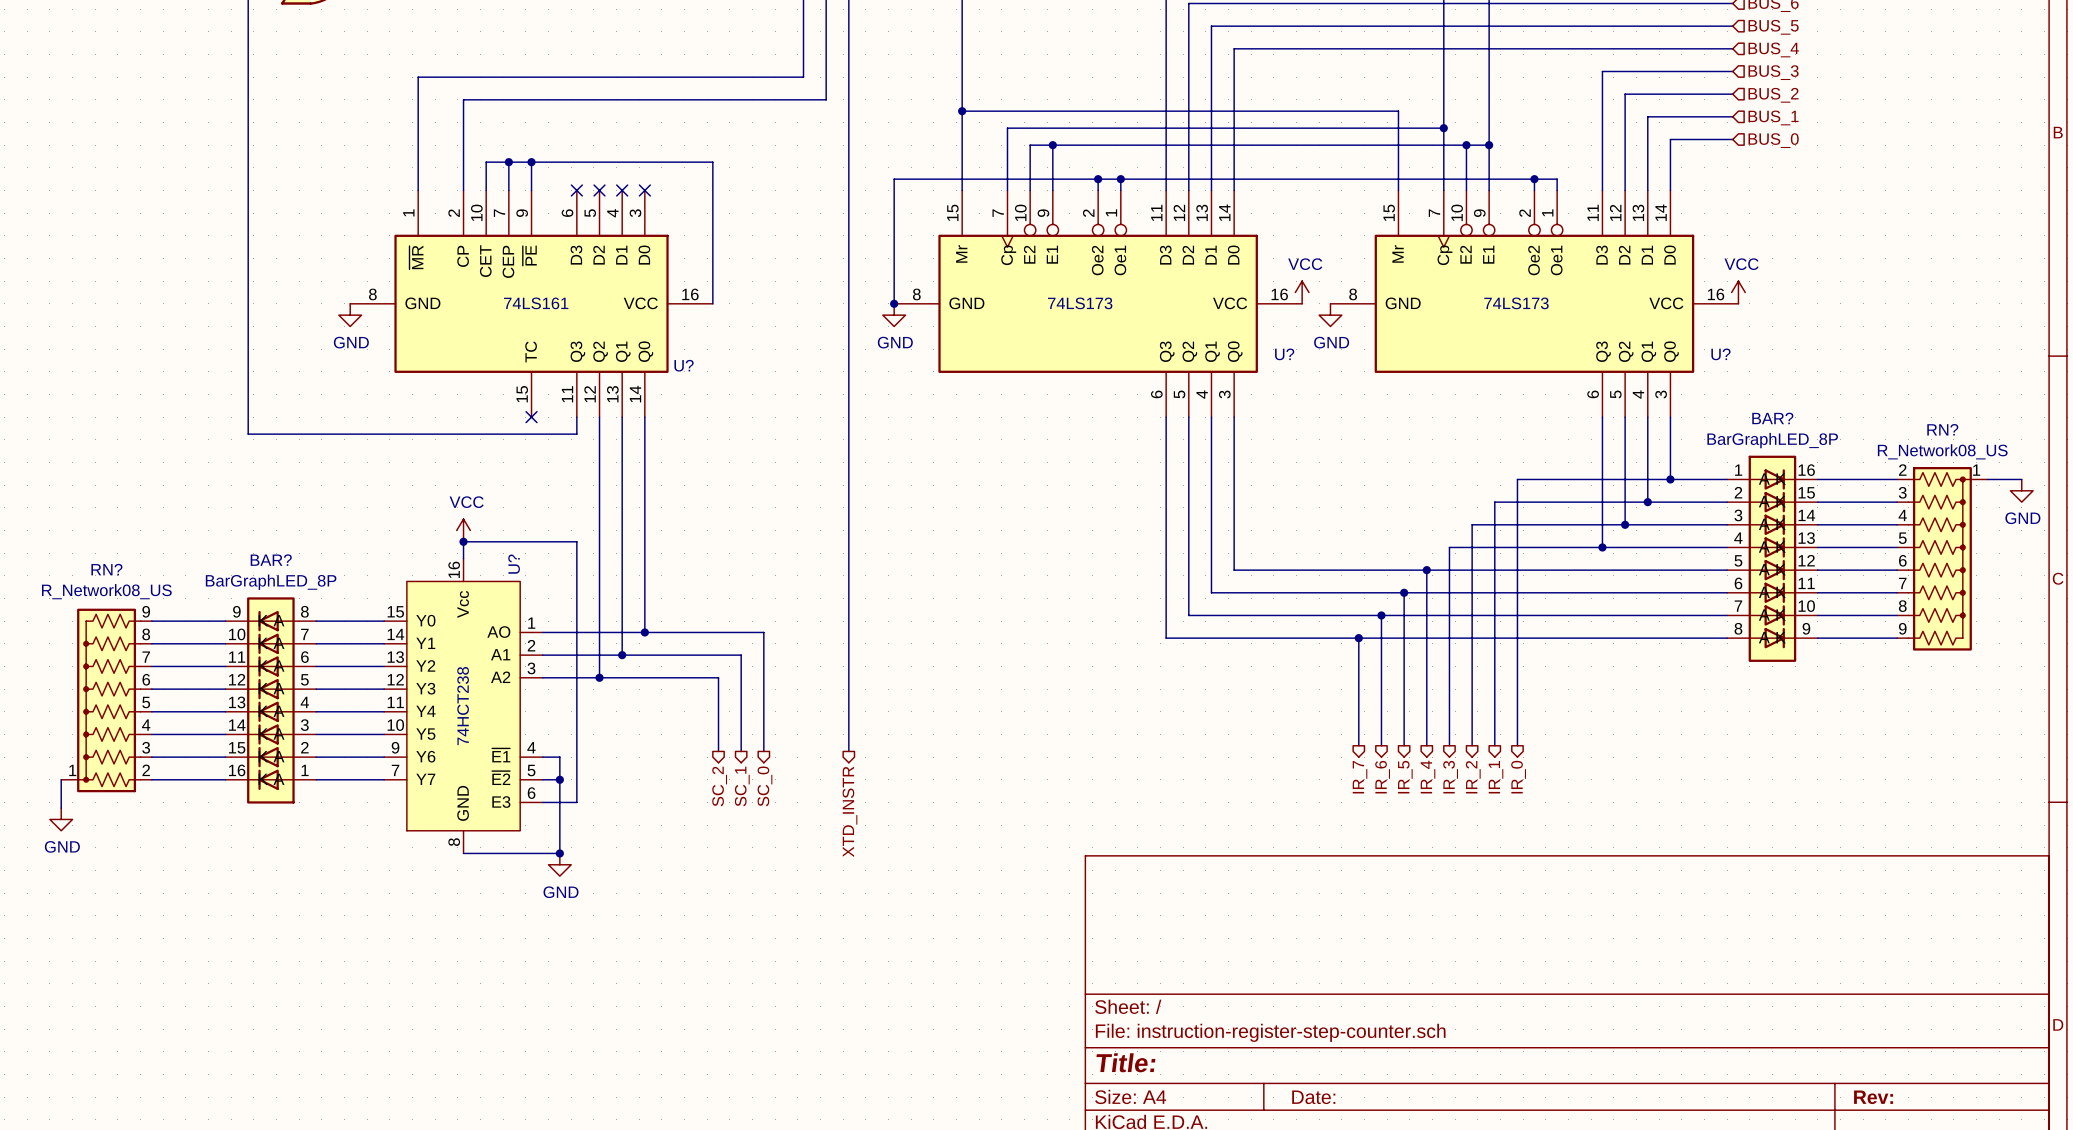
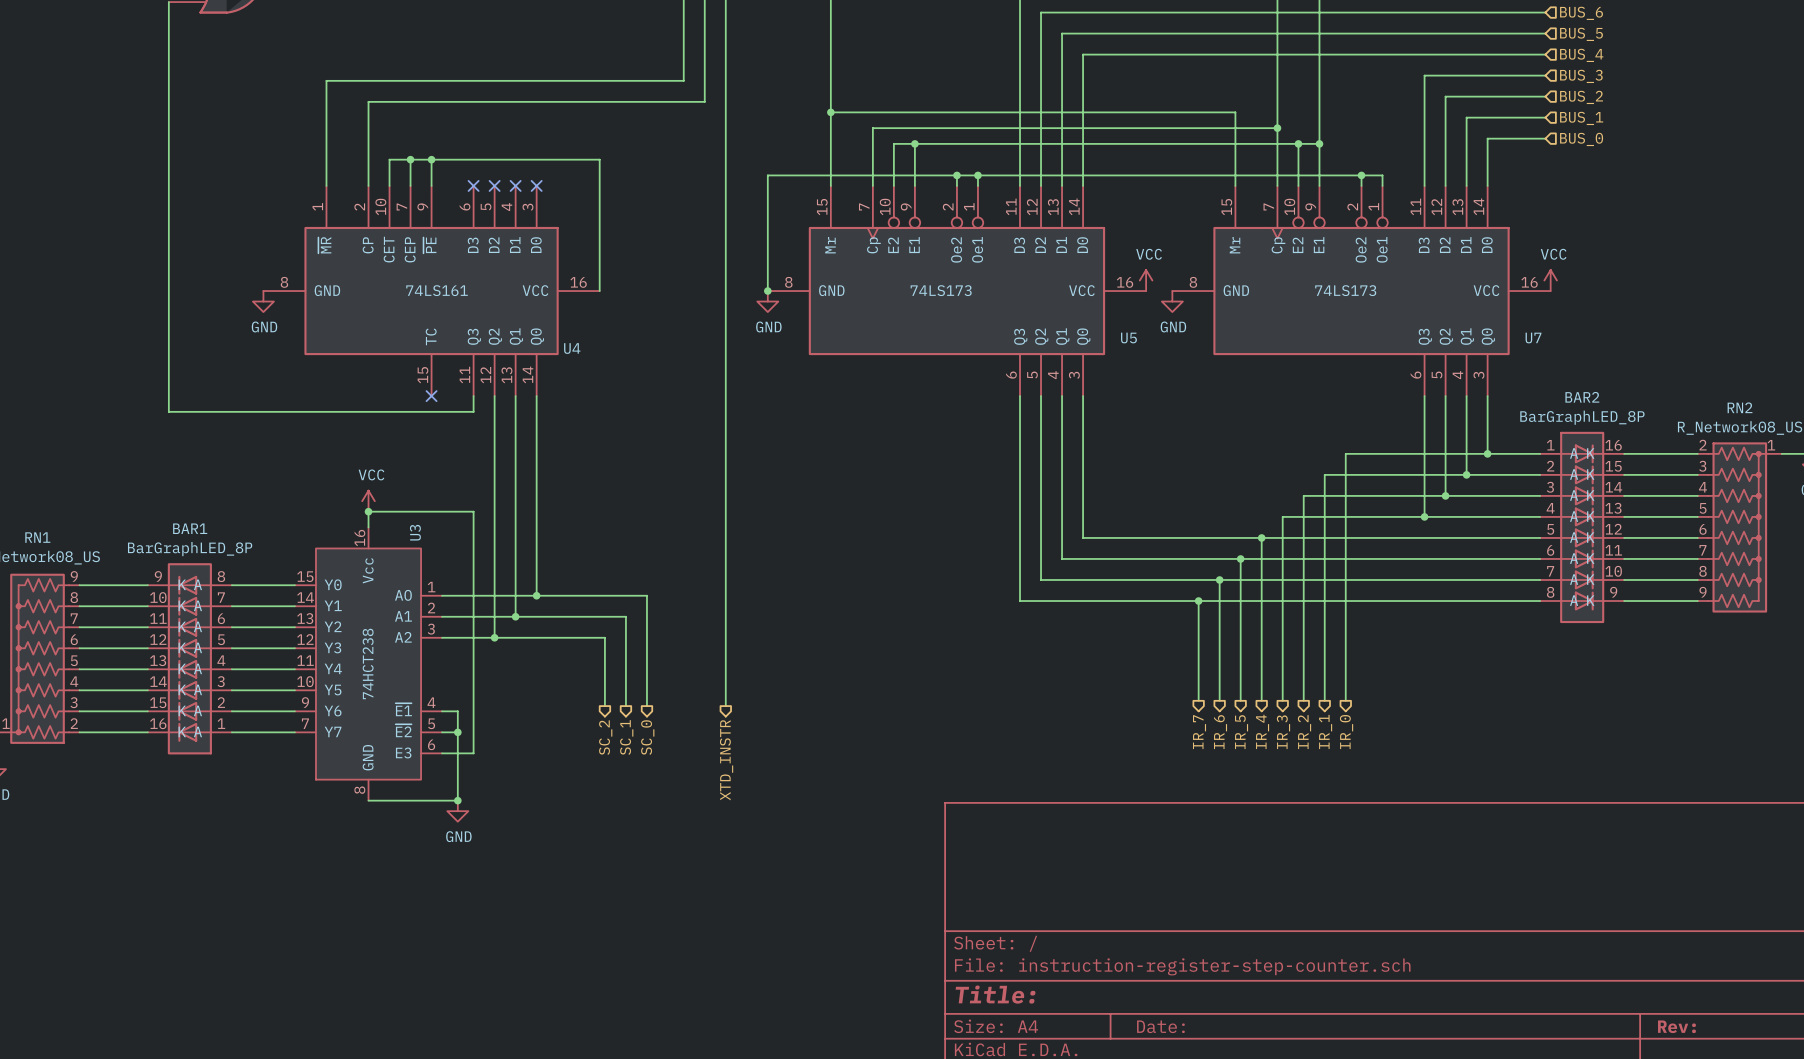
U? name: U? (1284, 354) -> U5 (1128, 338)
U? name: U? (1720, 354) -> U7 (1533, 338)
U? name: U? (684, 365) -> U4 (572, 348)
BAR? name: BAR? (1772, 418) -> BAR2 (1582, 397)
RN? name: RN? (1942, 429) -> RN2 (1740, 407)
BAR? name: BAR? (271, 560) -> BAR1 (190, 528)
U? name: U? (514, 564) -> U3 (415, 532)
RN? name: RN? (106, 569) -> RN1 (37, 537)

